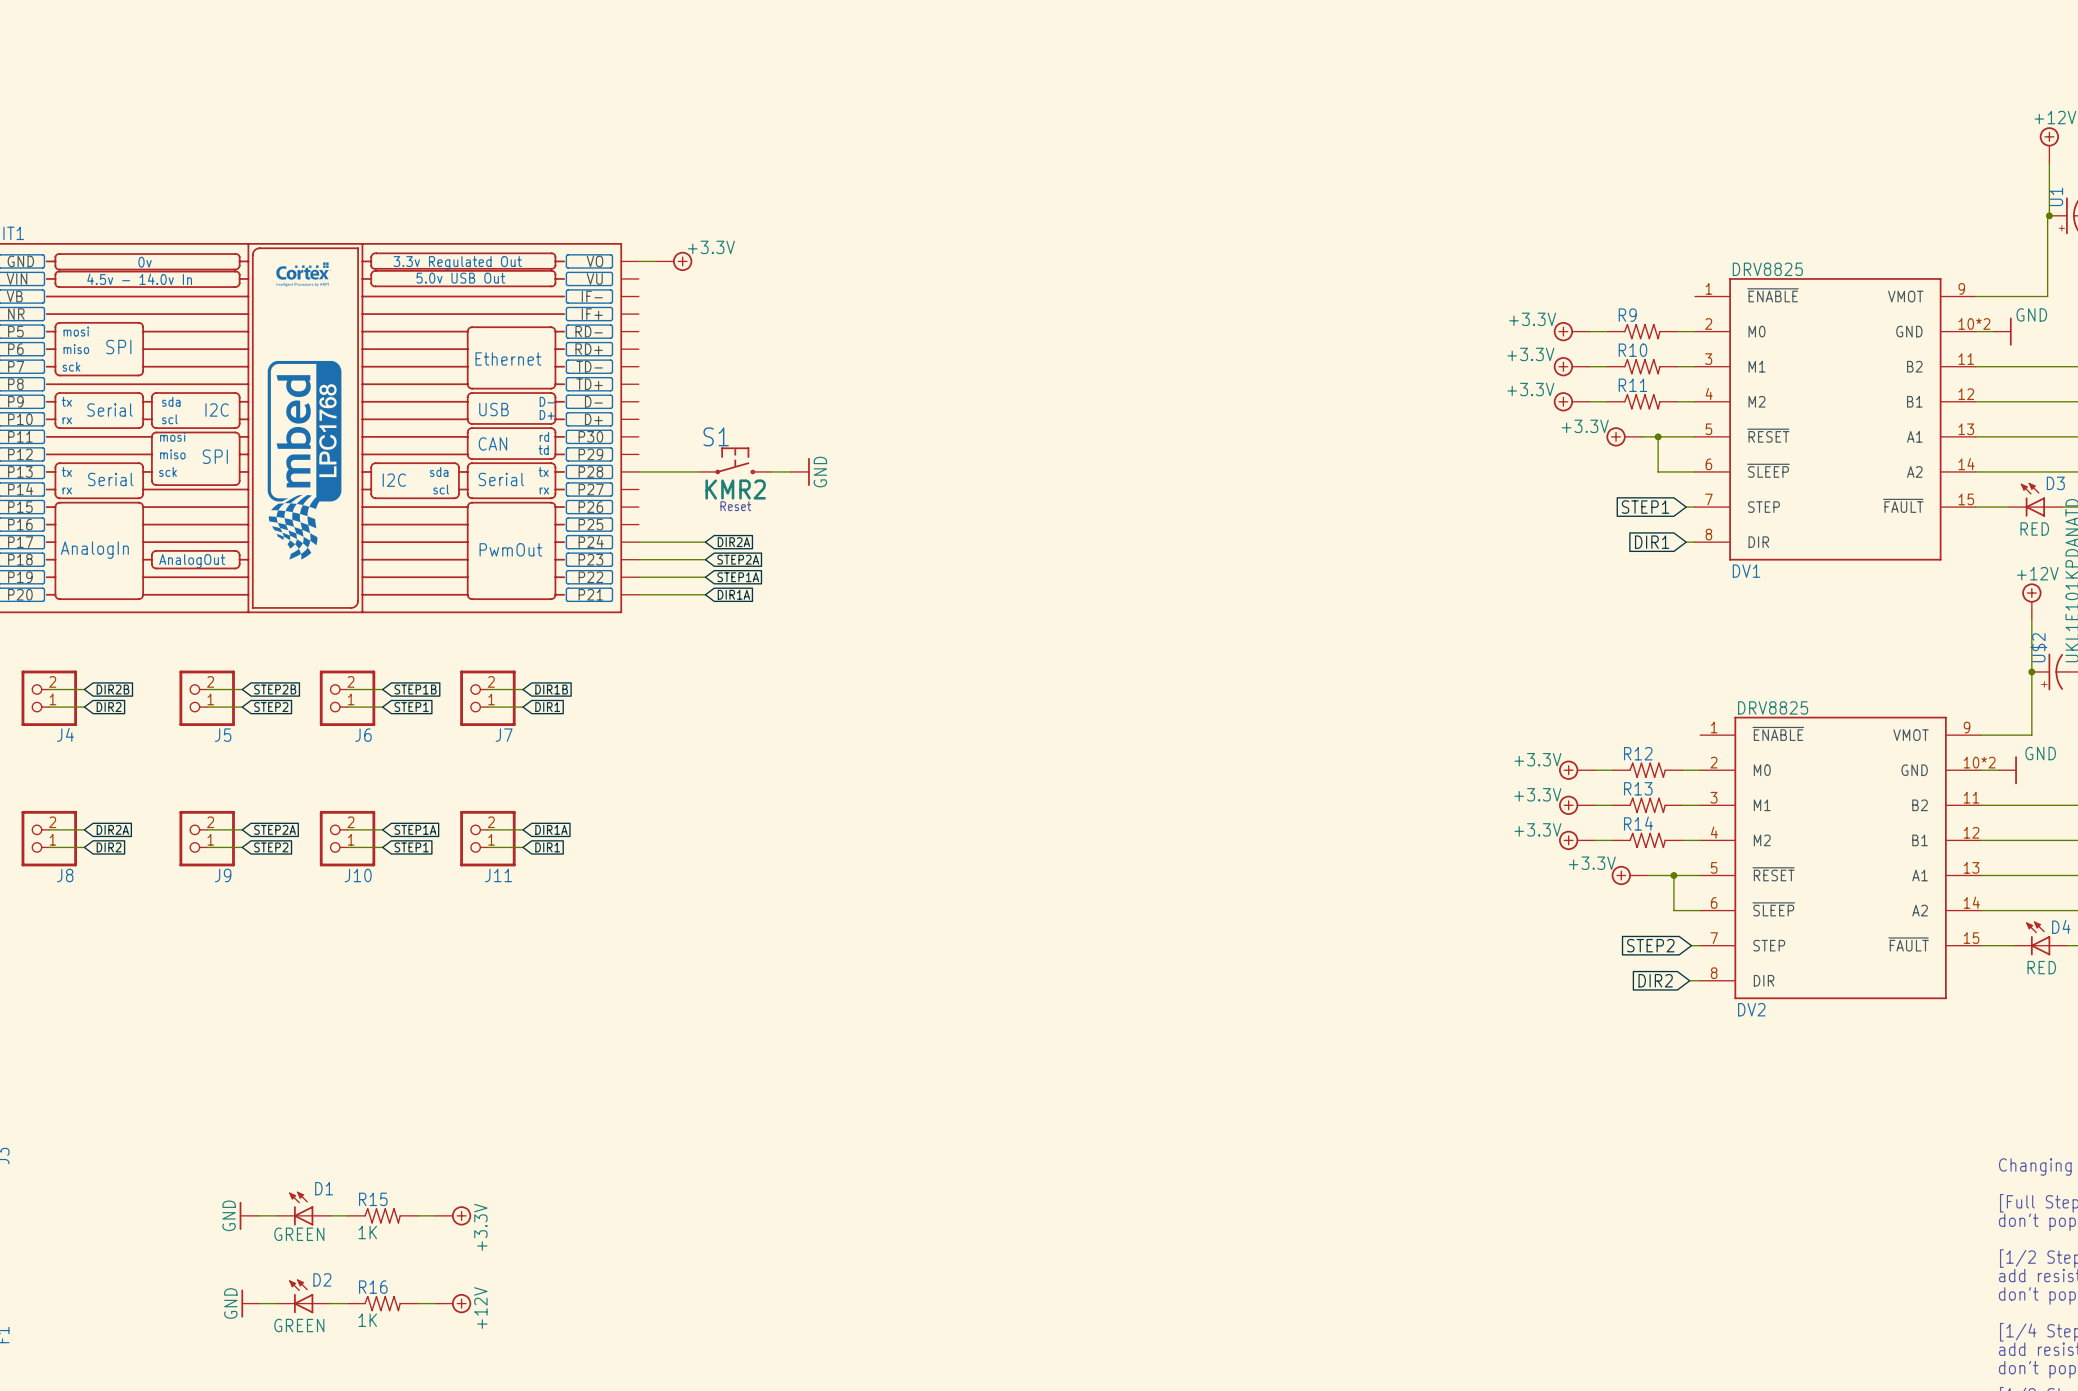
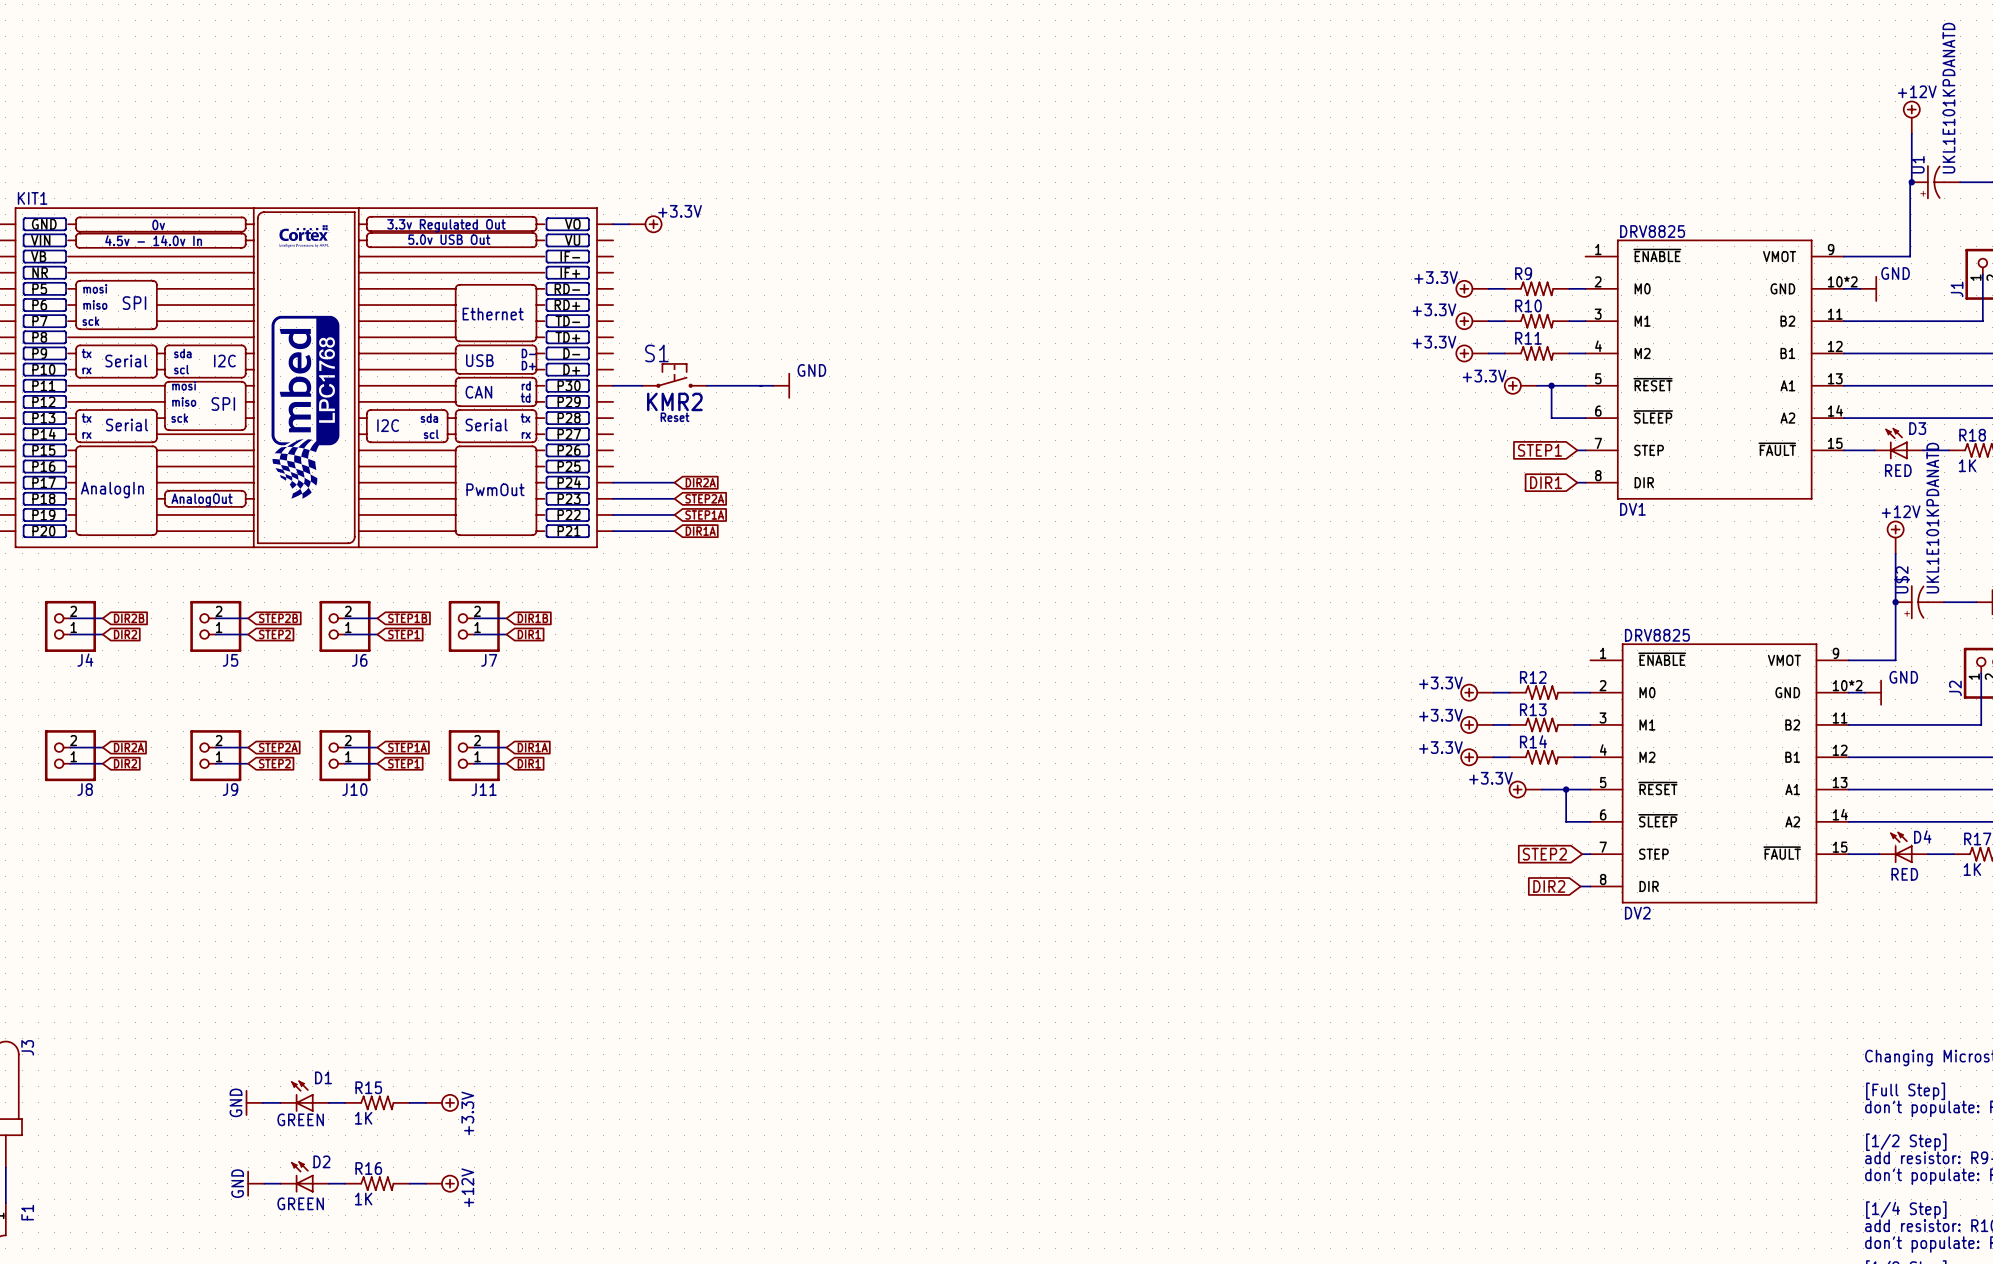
wire: none -> (613, 385) (642, 385)
wire: none -> (706, 385) (773, 385)
S1 position: (735, 460) -> (674, 375)
wire: (638, 471) (700, 471) -> none
wire: (770, 471) (791, 471) -> none
power symbol position: GND (800, 471) -> GND (781, 385)
power symbol text rotation: 0° (820, 472) -> 90° clockwise (811, 370)

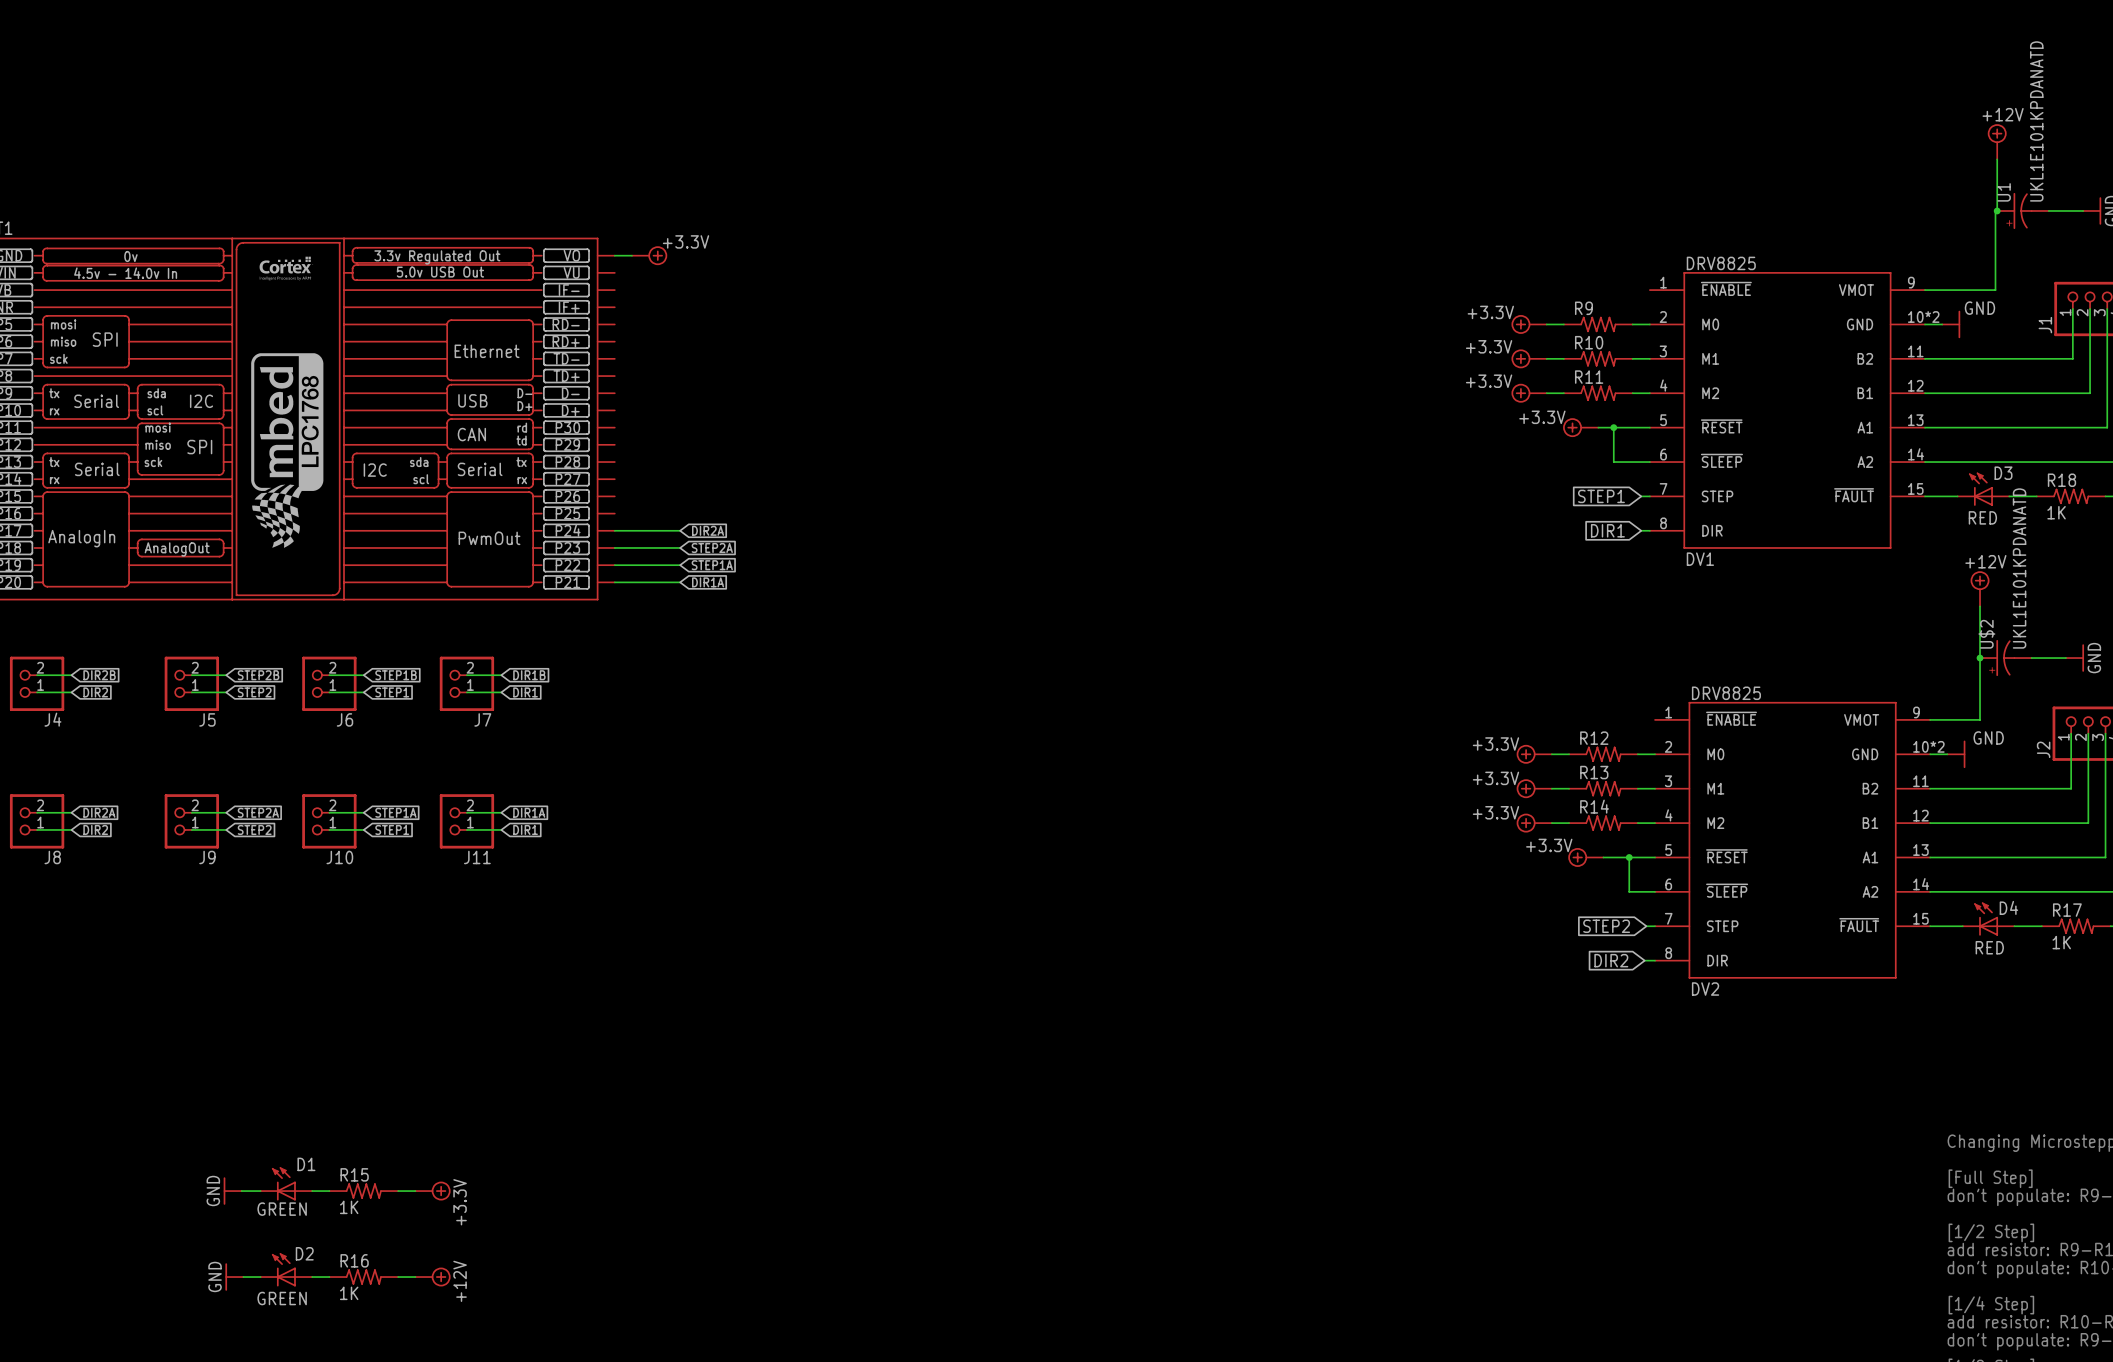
S1: KMR2 (674, 375) -> none
wire: (613, 385) (642, 385) -> none
wire: (706, 385) (773, 385) -> none
power symbol: GND (781, 385) -> none

